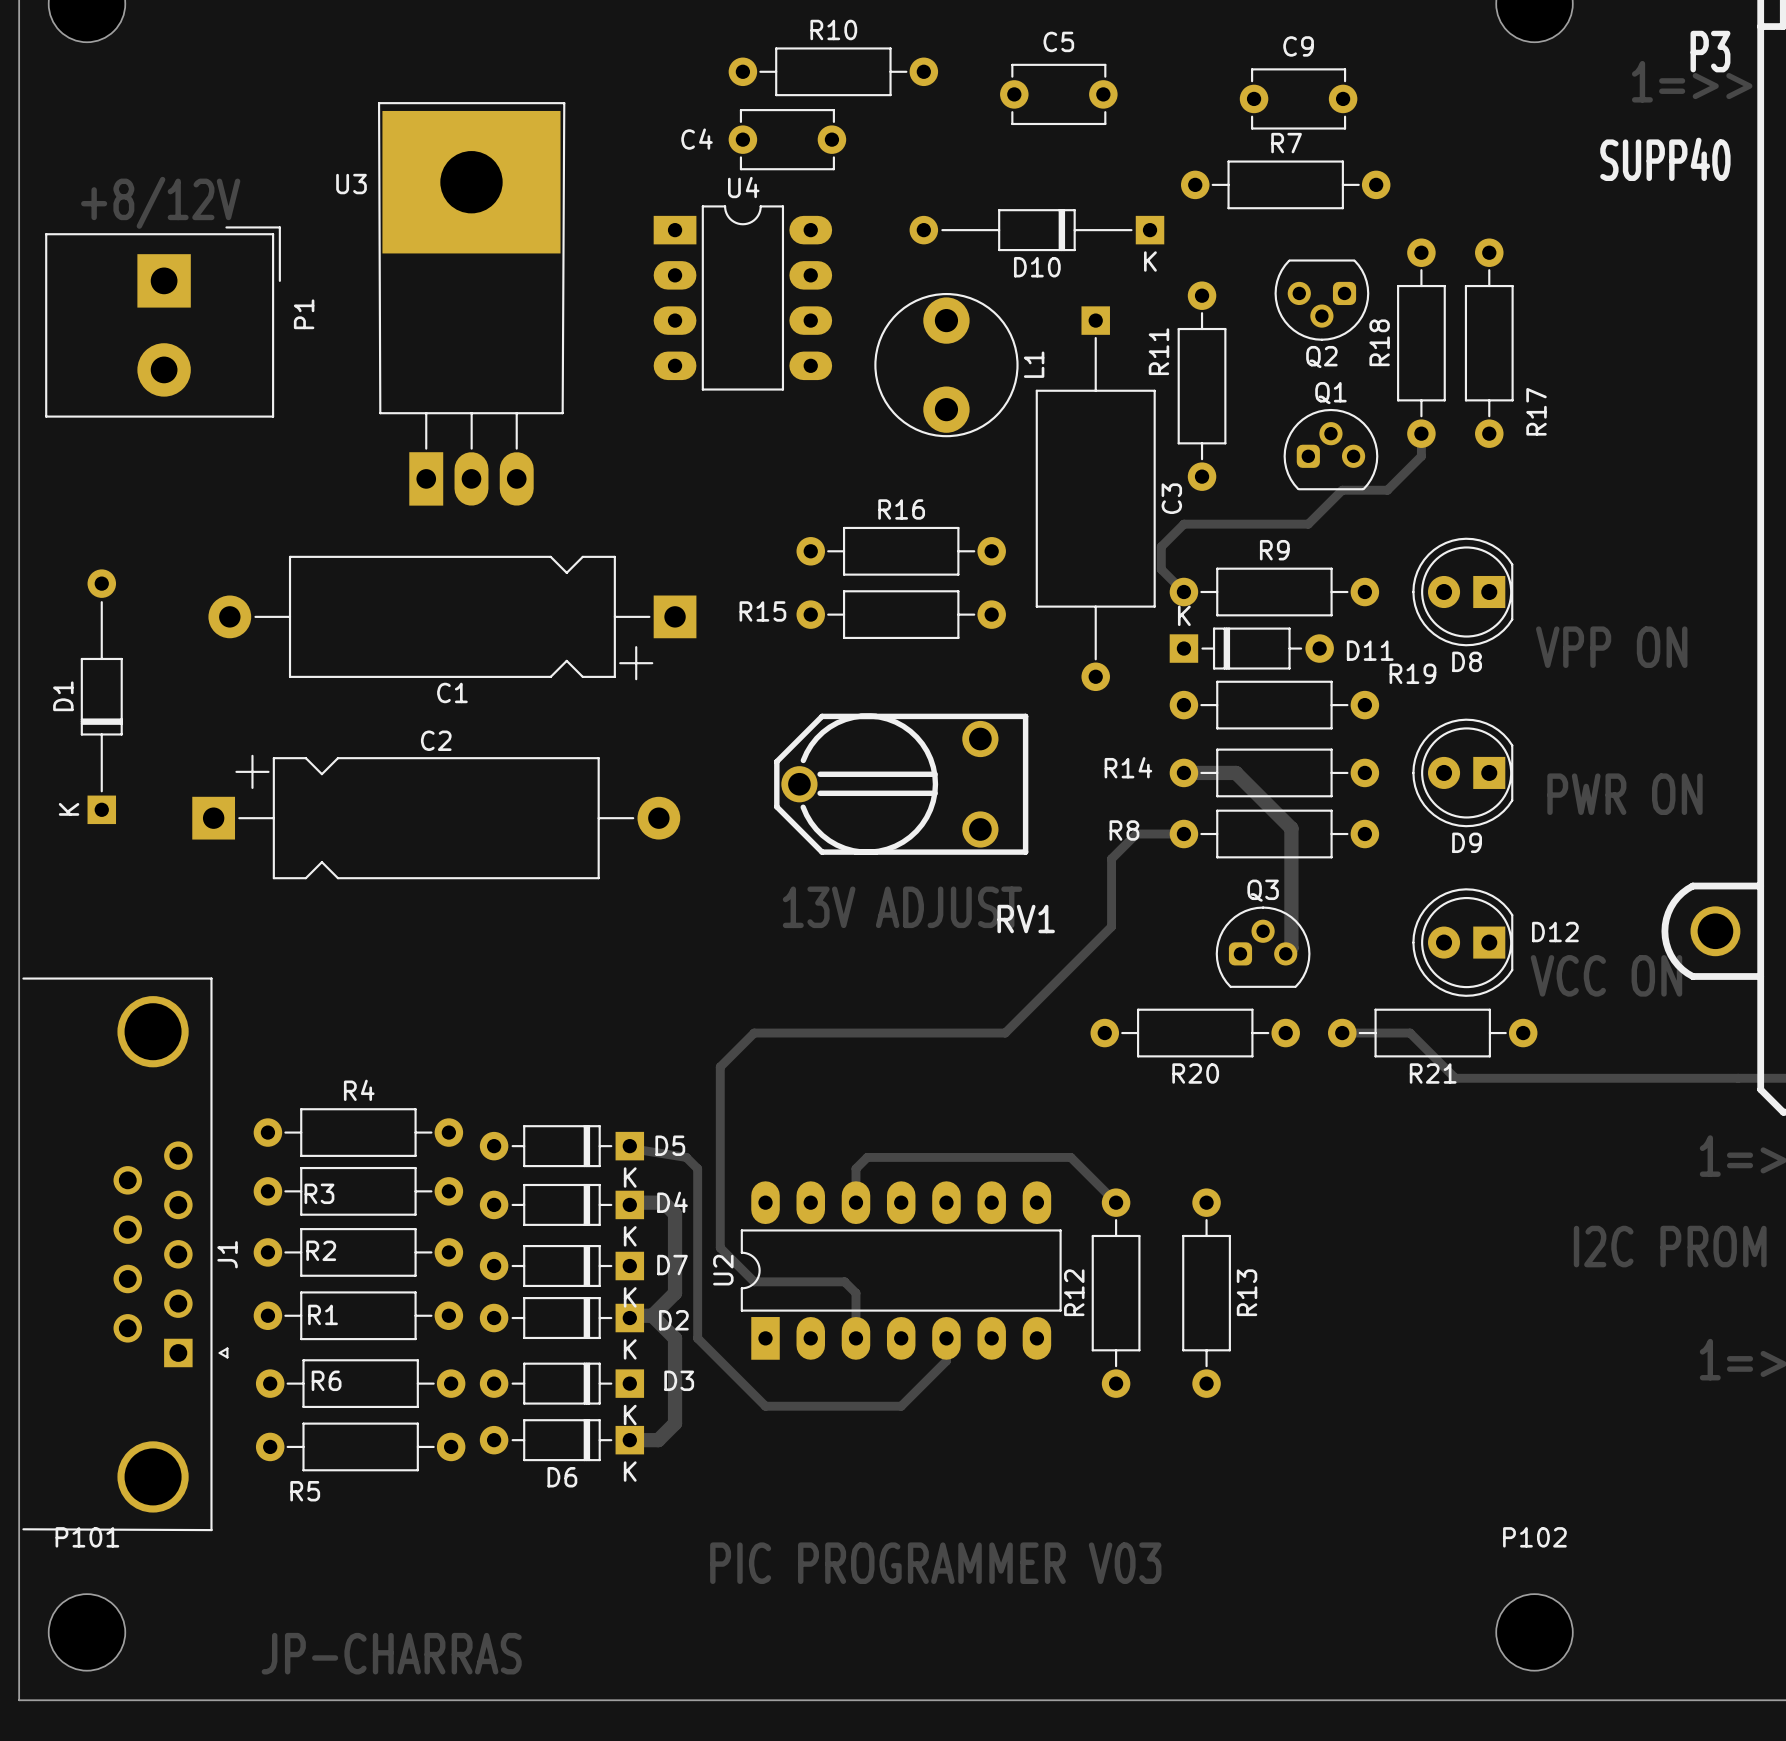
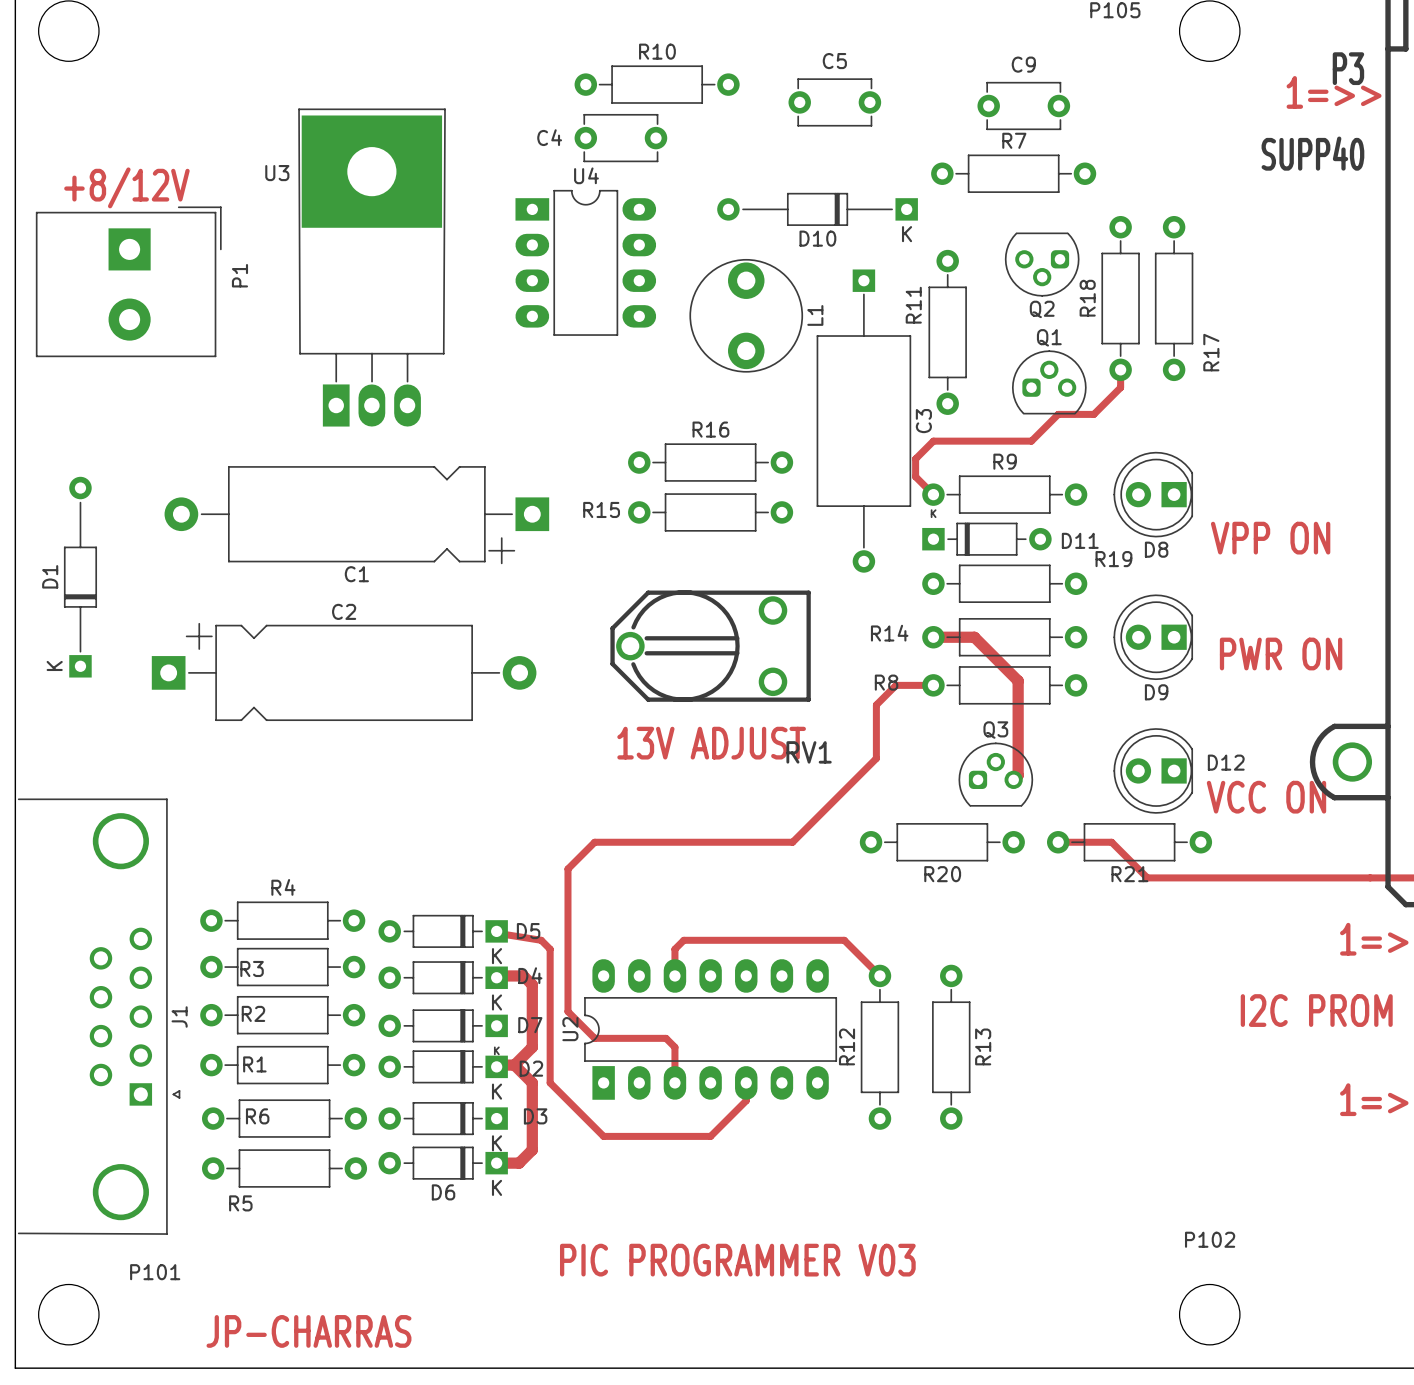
D11 footprint: [1169, 627, 1334, 670] -> [922, 522, 1052, 556]
D7 footprint: [479, 1244, 645, 1288] -> [378, 1009, 508, 1043]
P101 name position: P101 (87, 1537) -> P101 (155, 1272)

